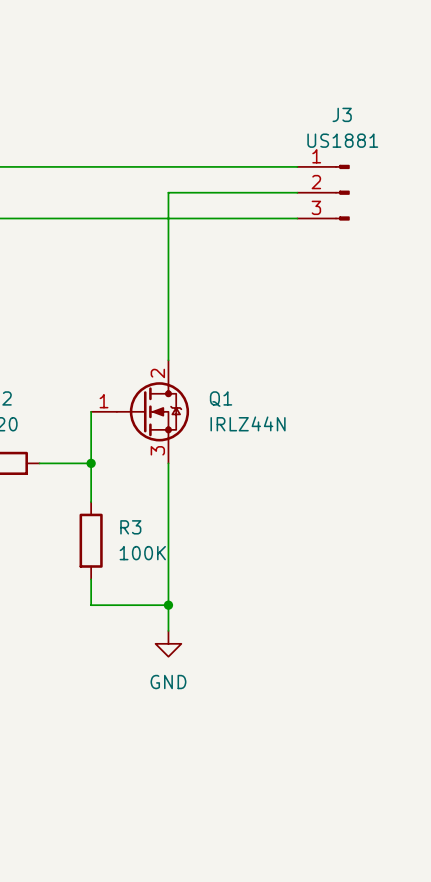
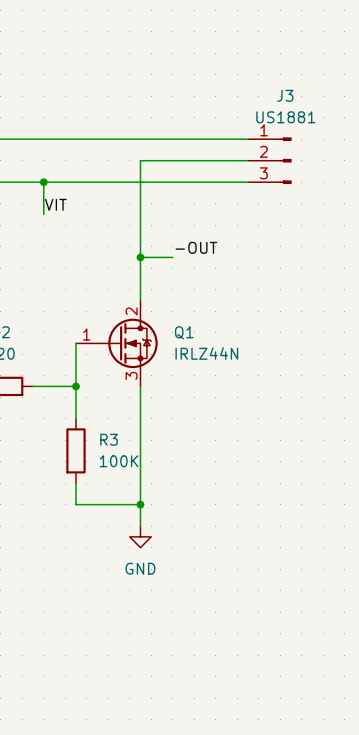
wire: none -> (43, 182) (43, 214)
junction: none -> (43, 182)
label: none -> VIT (55, 204)
label: none -> -OUT (196, 247)
wire: none -> (140, 257) (172, 257)
junction: none -> (140, 257)

